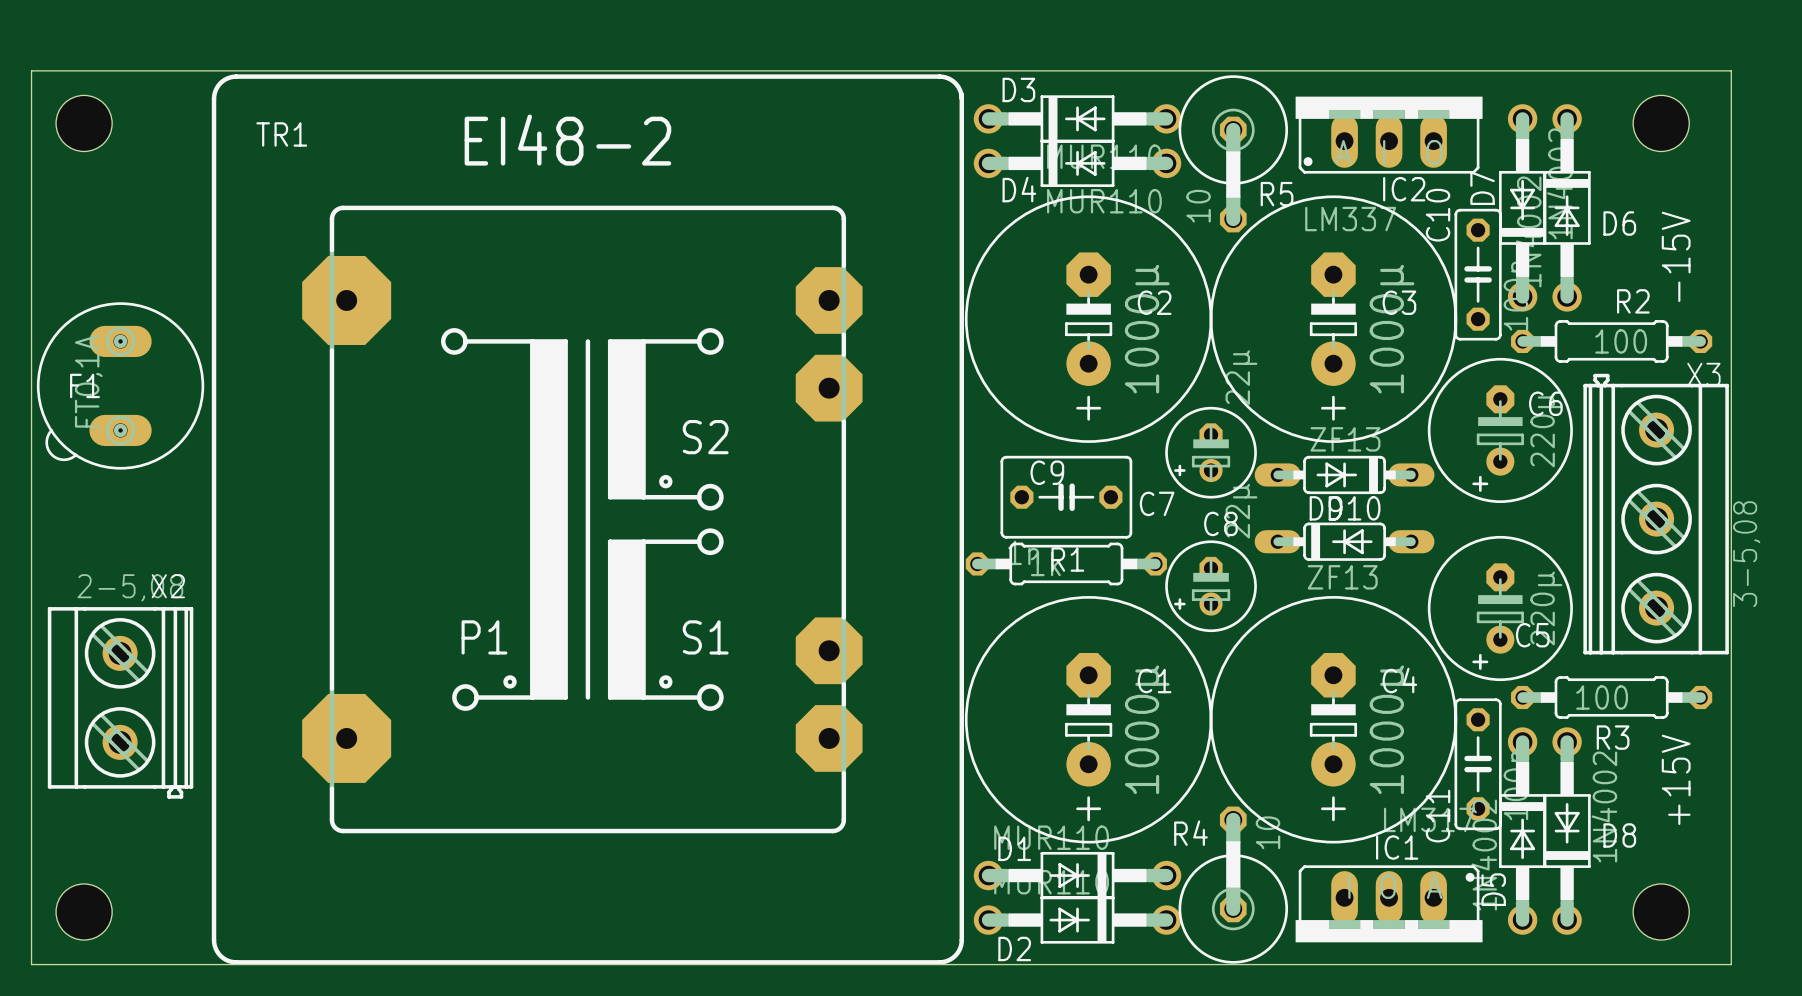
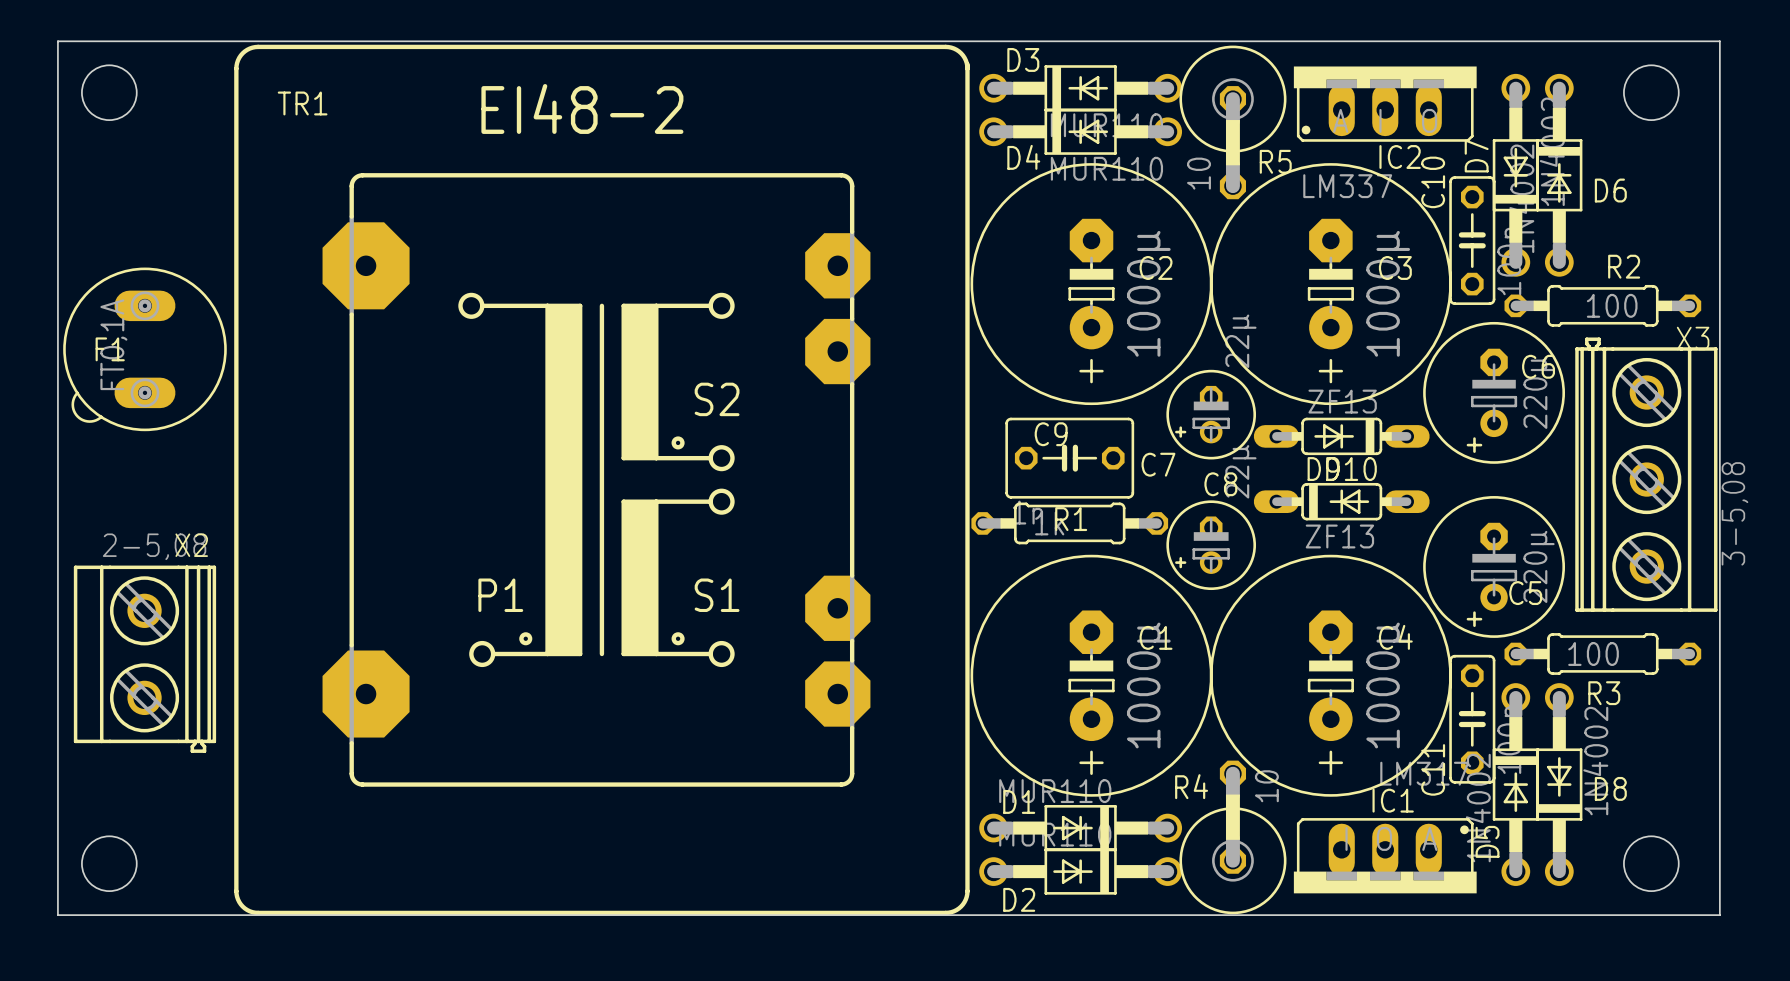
text: -15V (1676, 256) -> none
text: +15V (1676, 779) -> none

